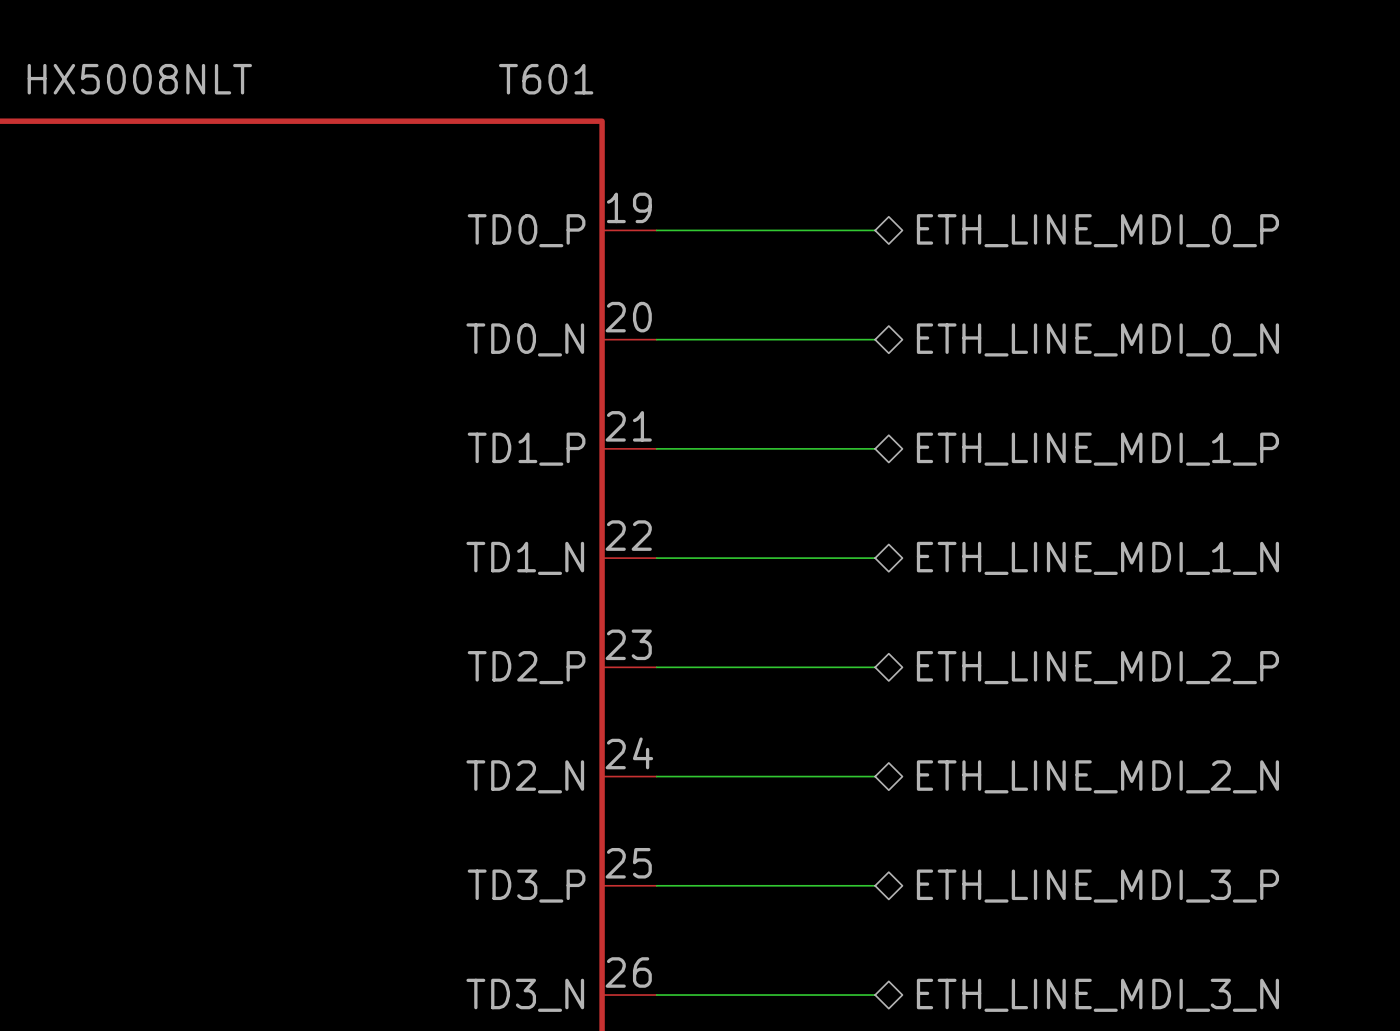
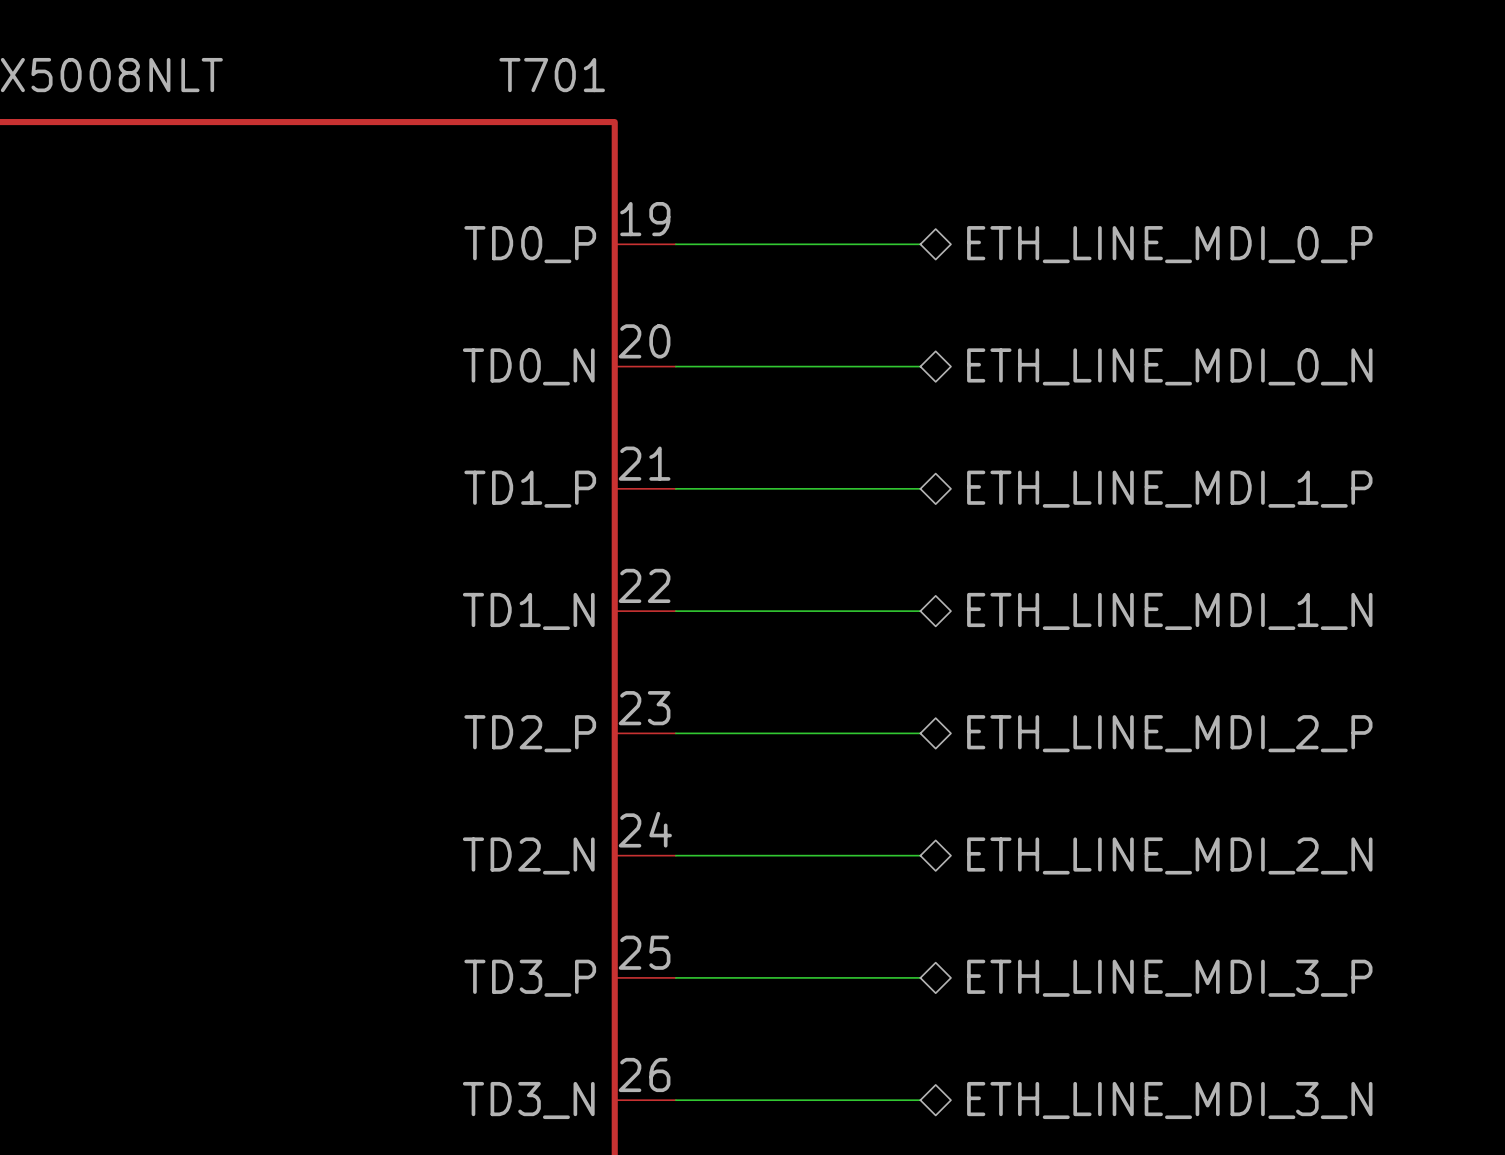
T601 name: T601 (546, 79) -> T701 (552, 75)

